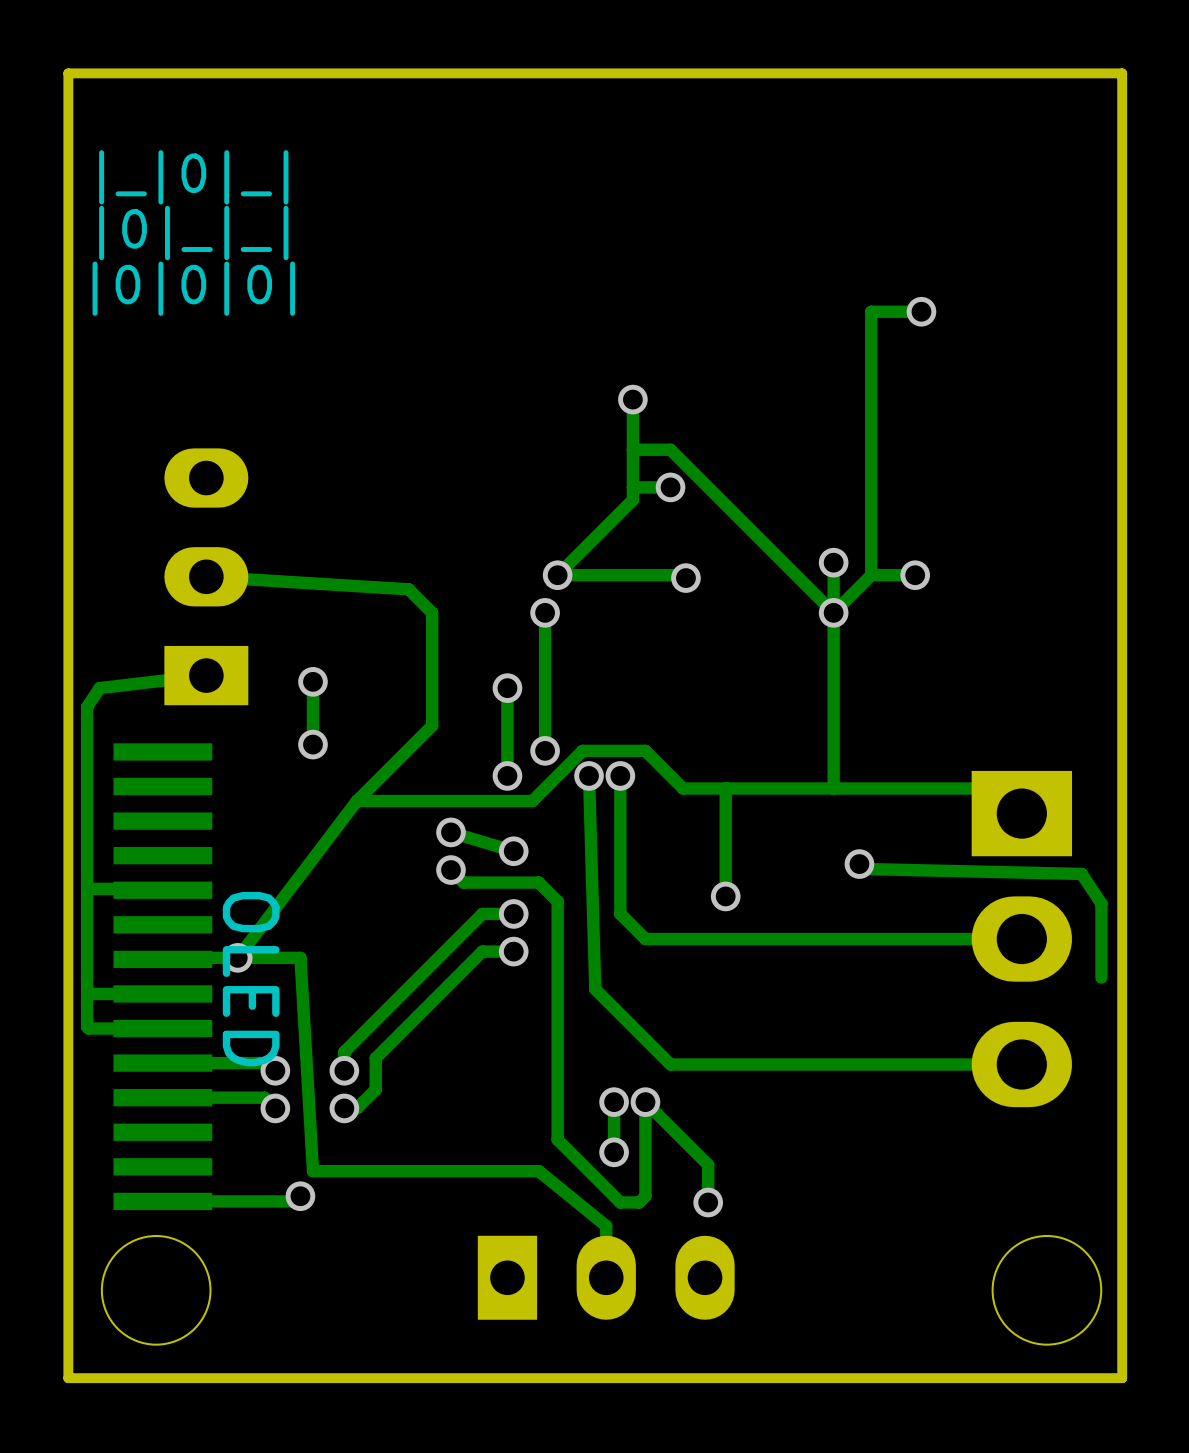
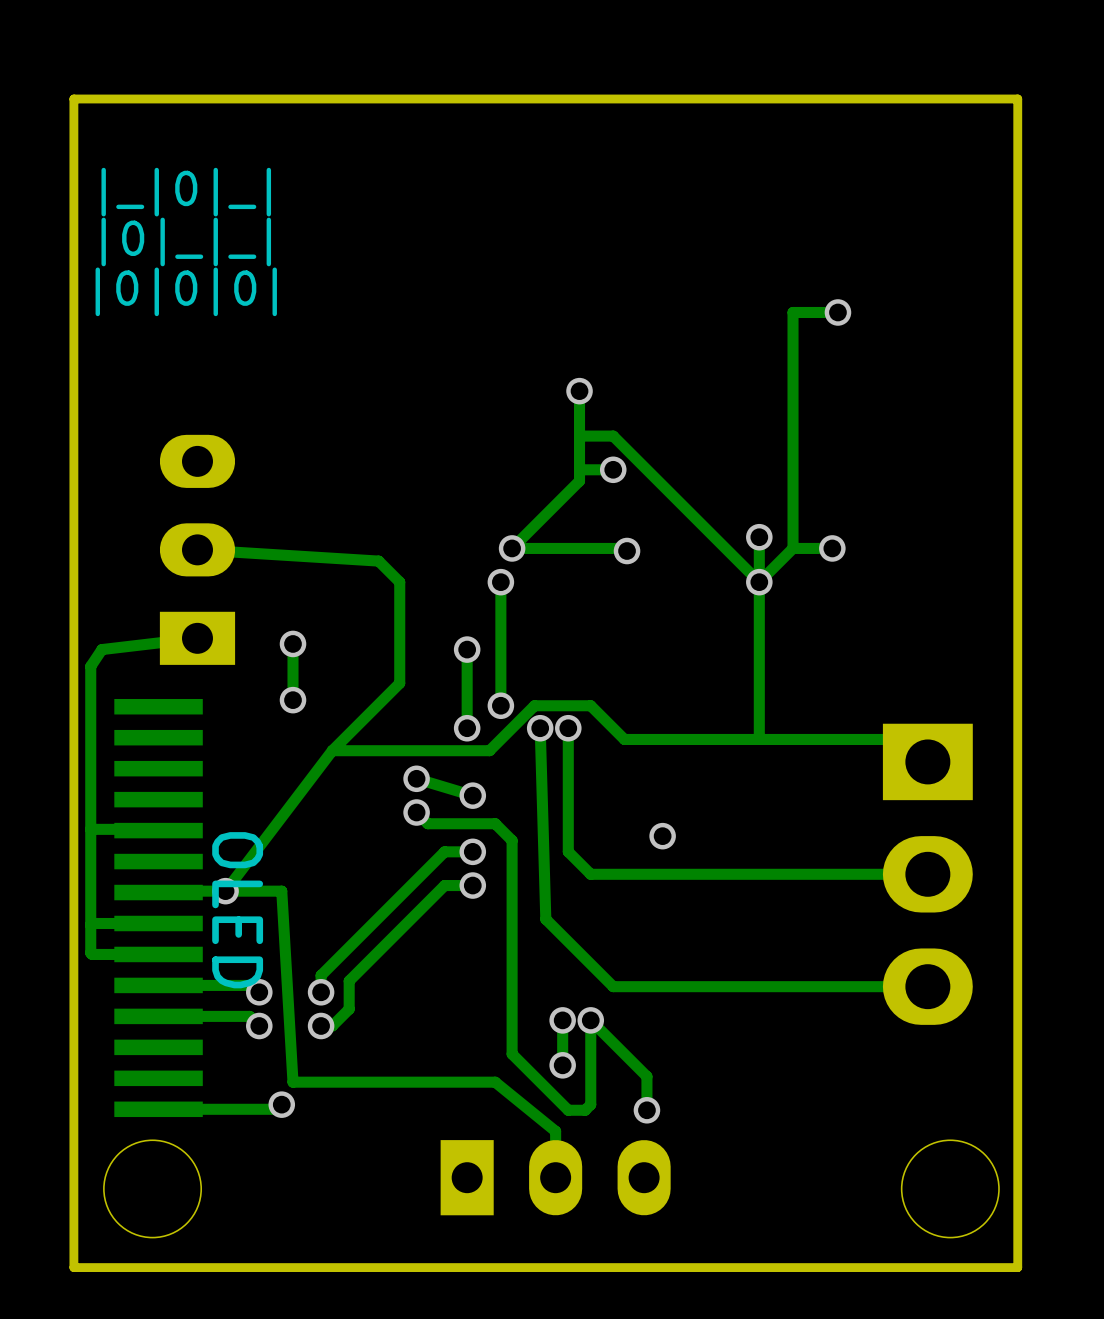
track: (725, 788) (725, 896) -> none
track: (859, 864) (864, 869) (1081, 873) (1101, 903) (1101, 977) -> none
via: (859, 864) -> none

